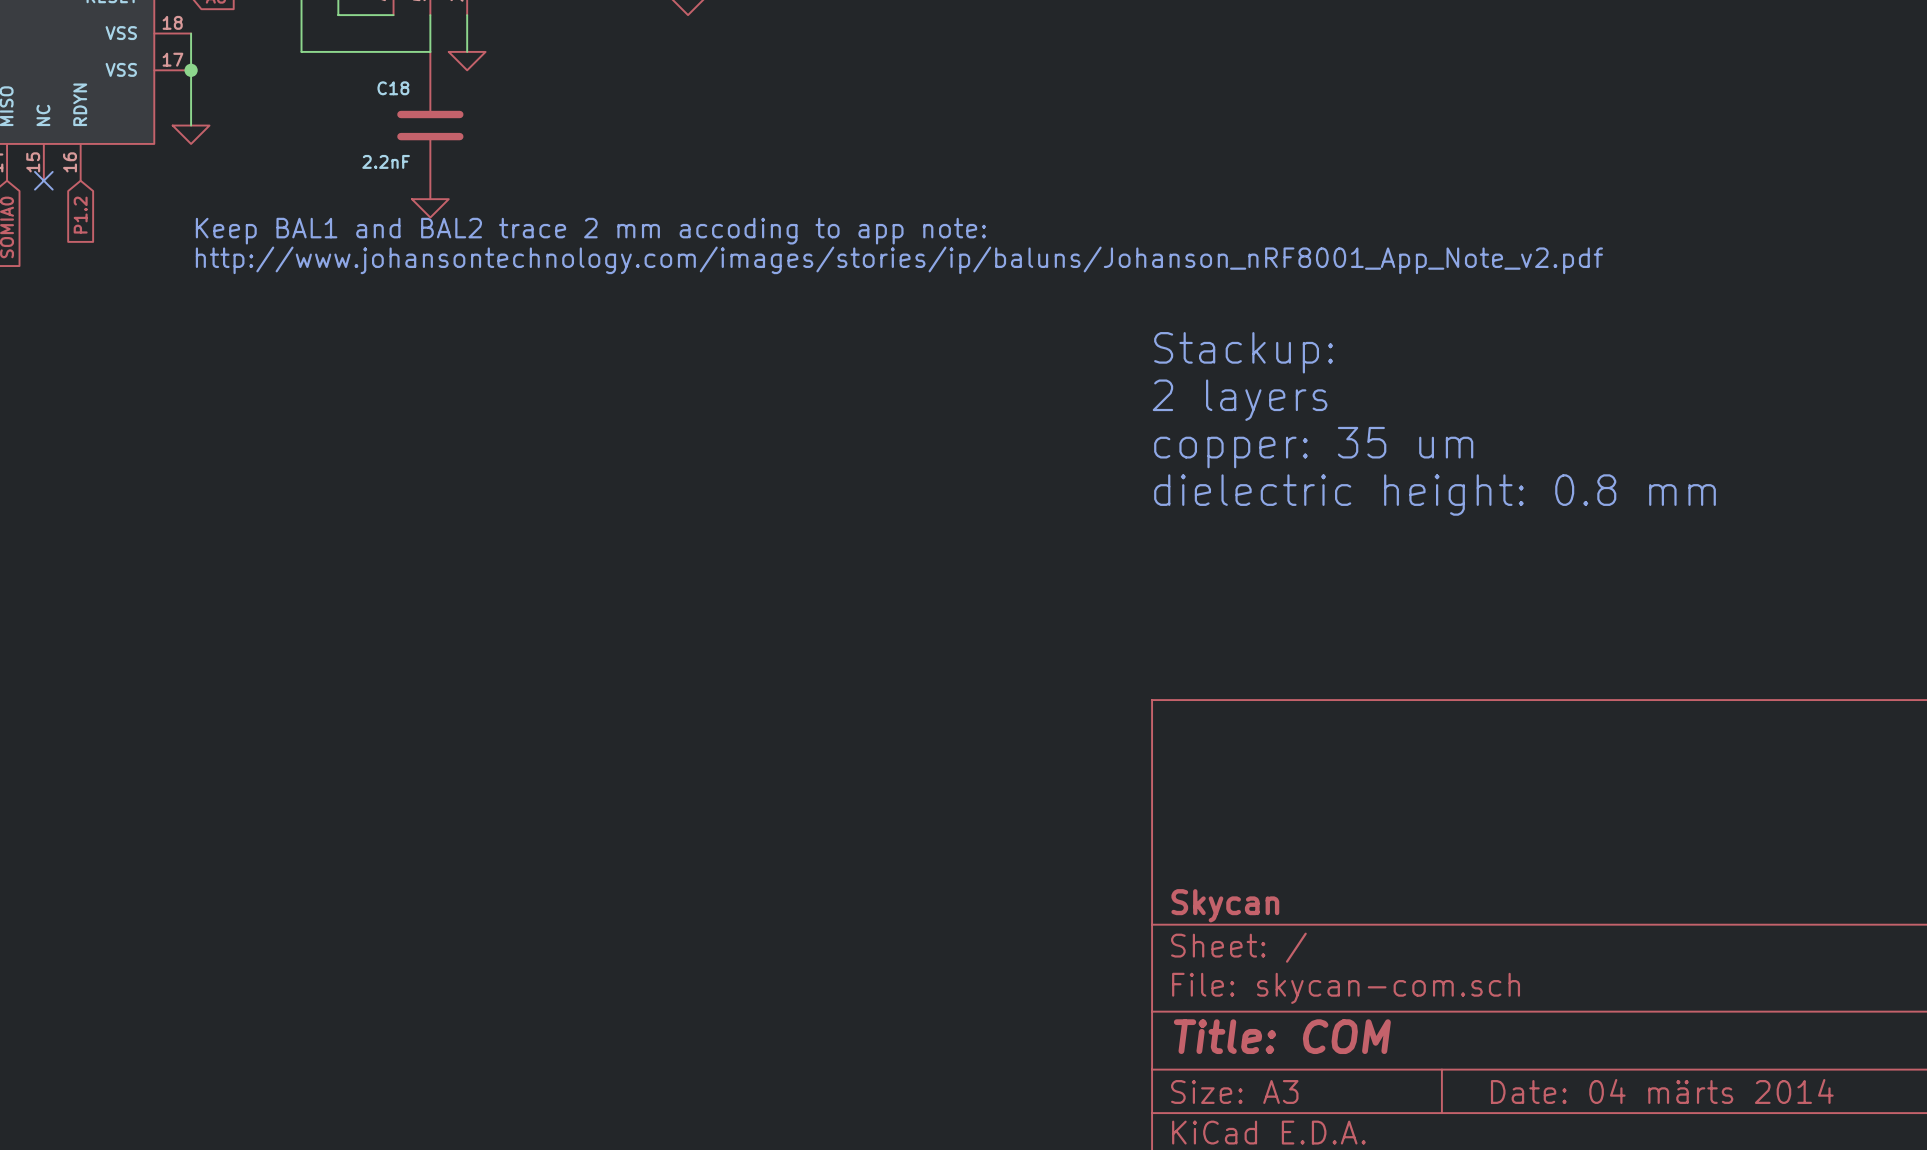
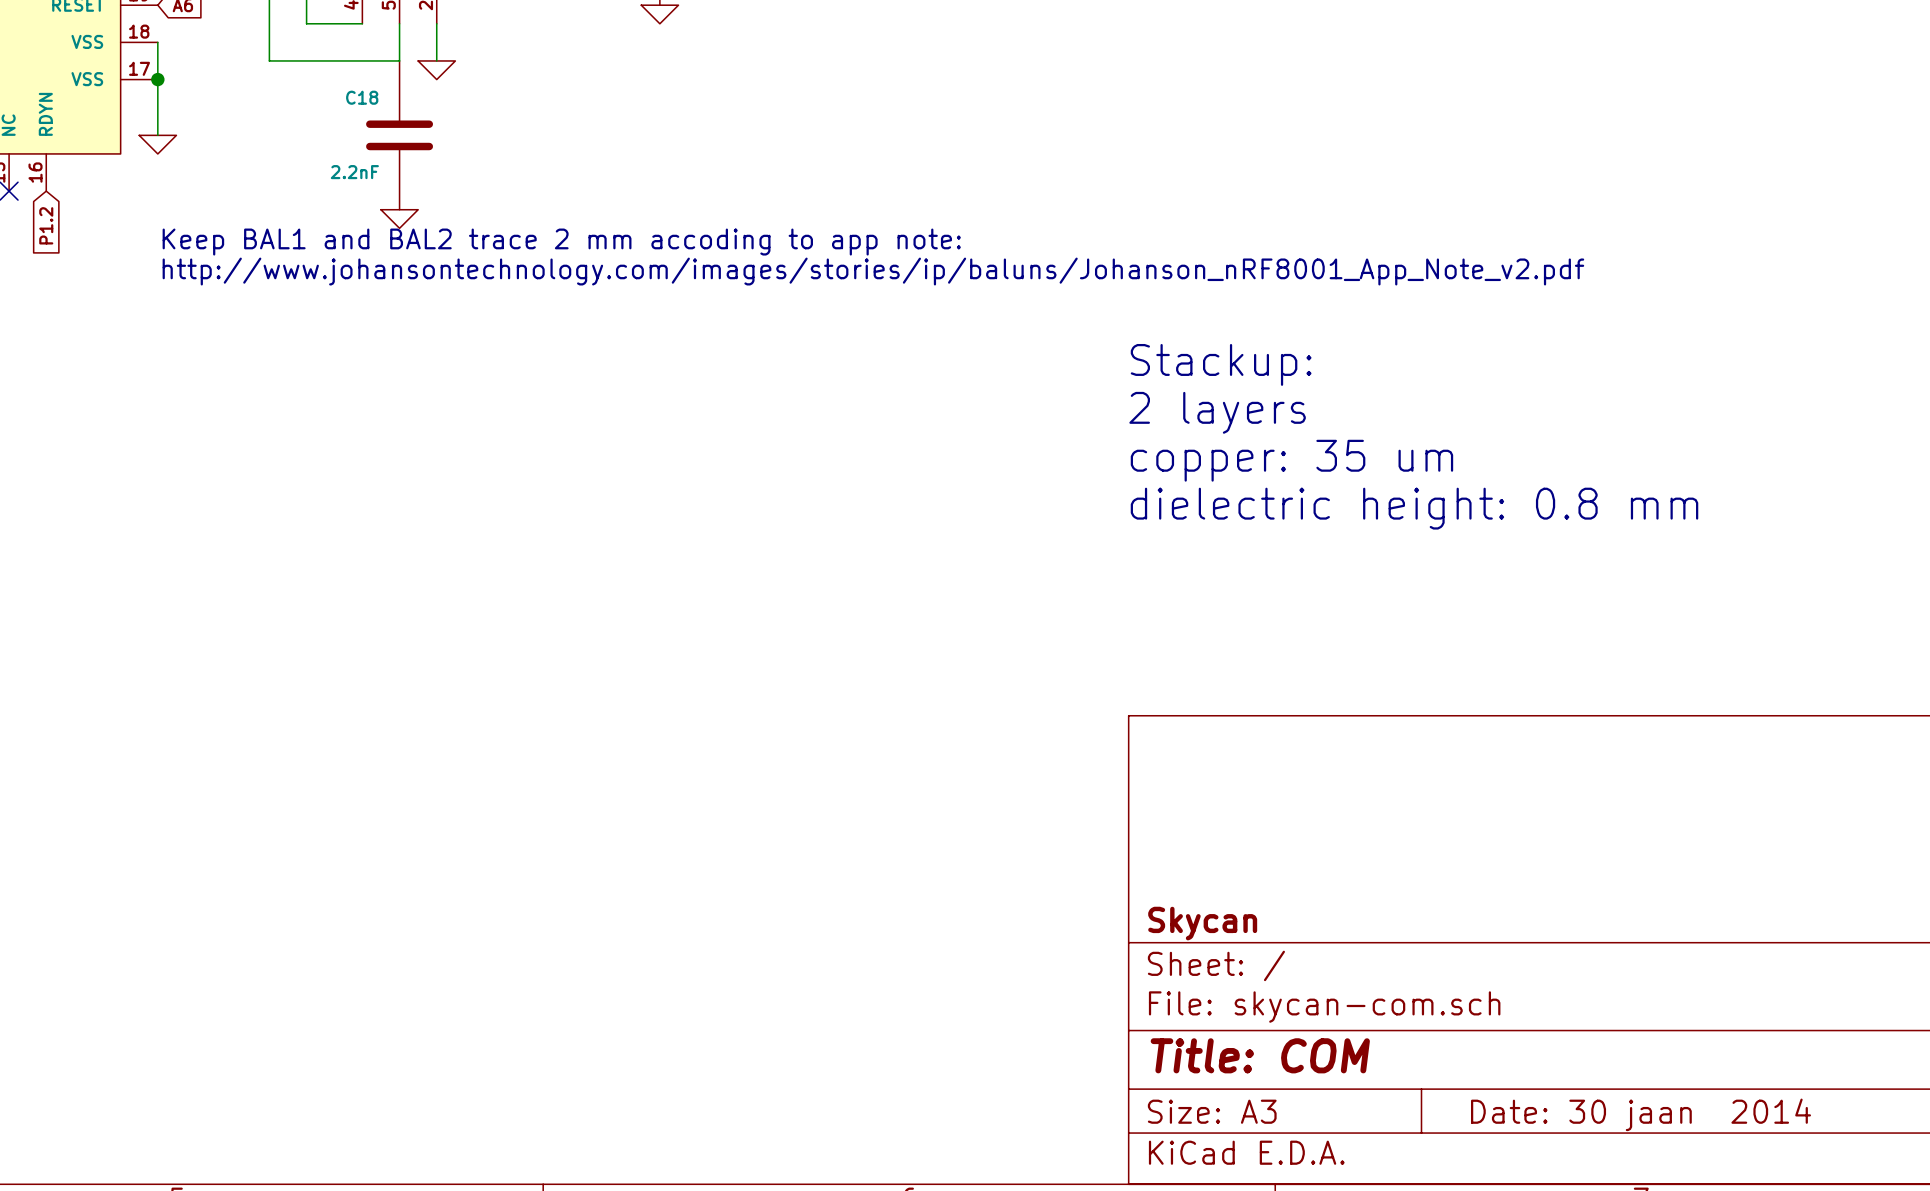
title block: Date: 04 märts 2014 (1662, 1091) -> Date: 30 jaan 2014 (1641, 1114)

